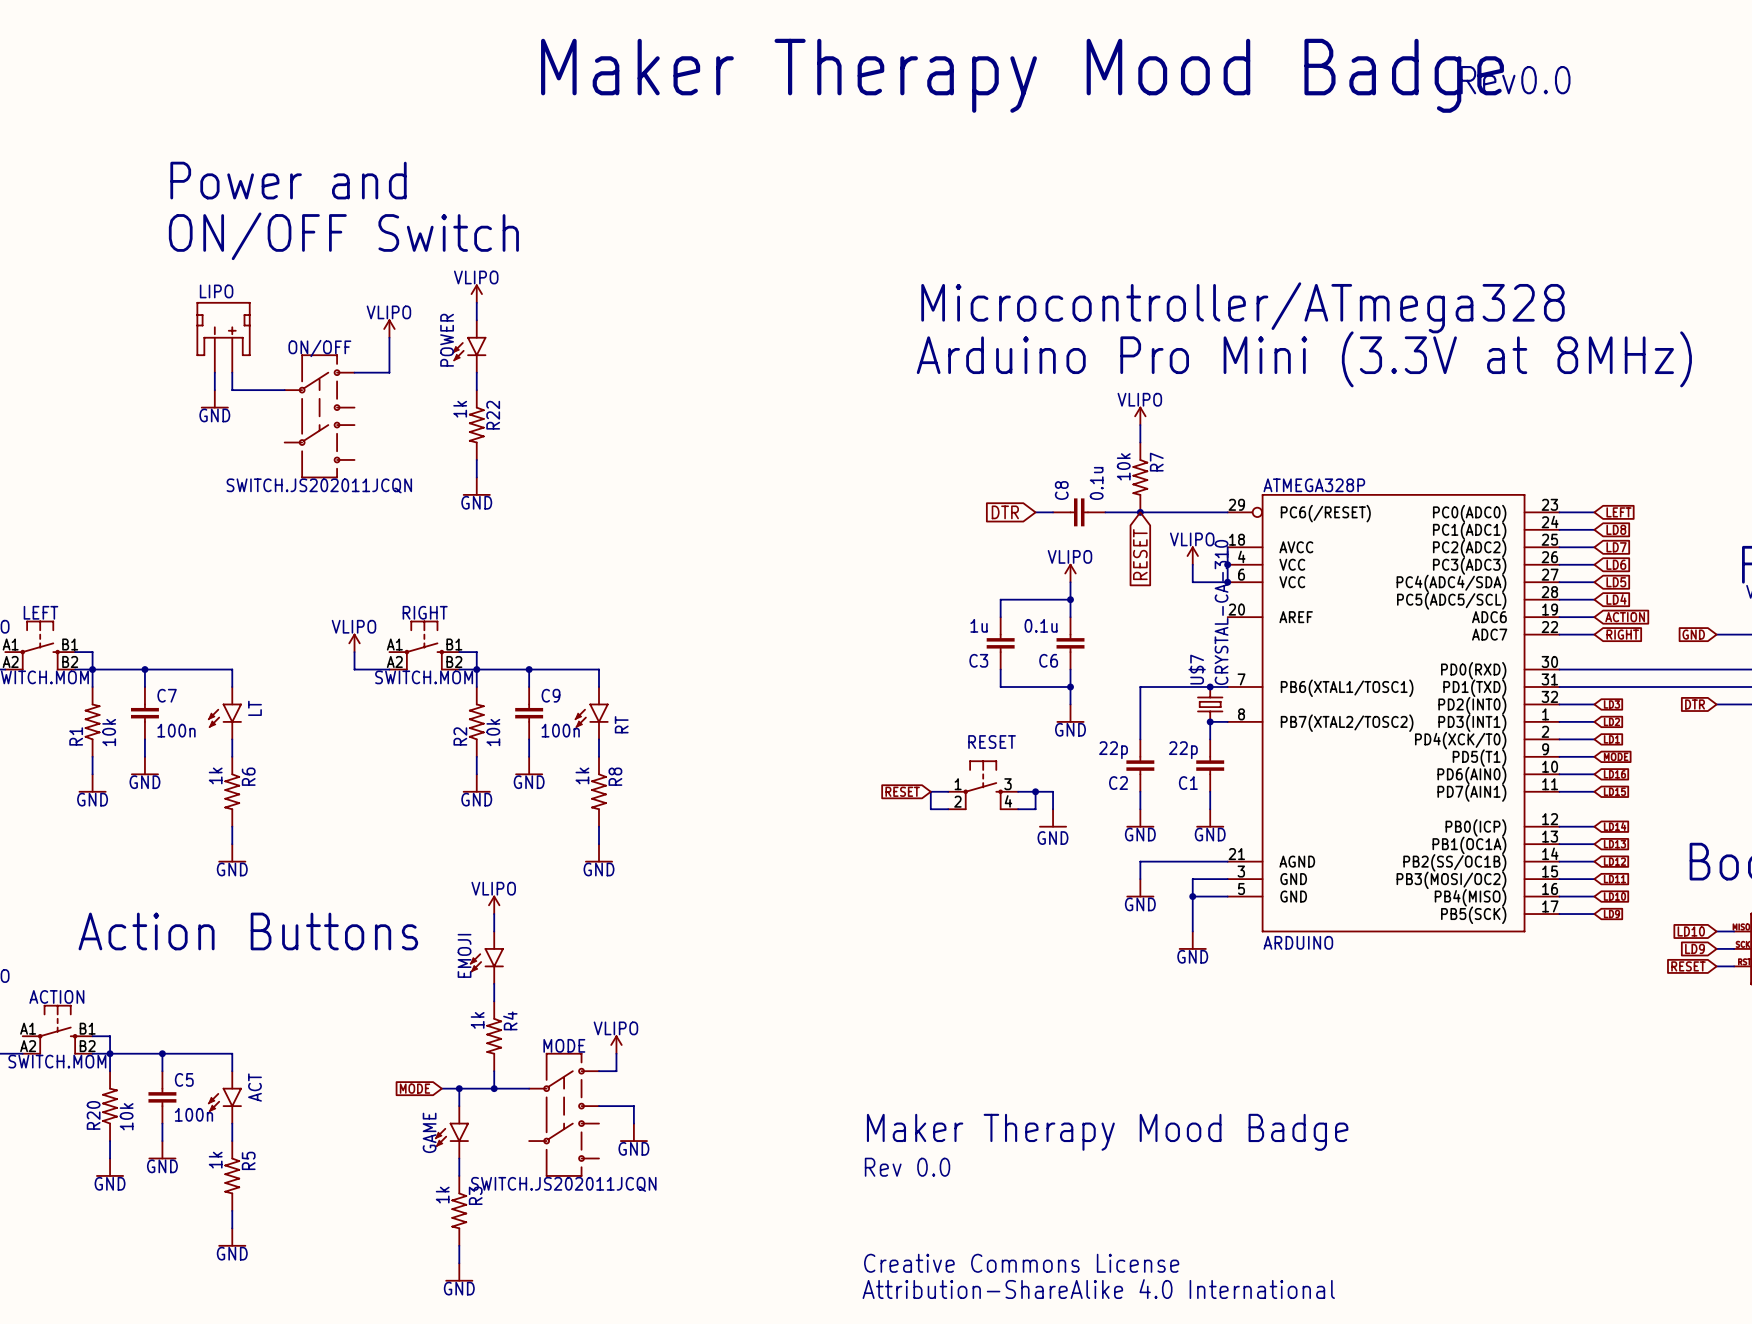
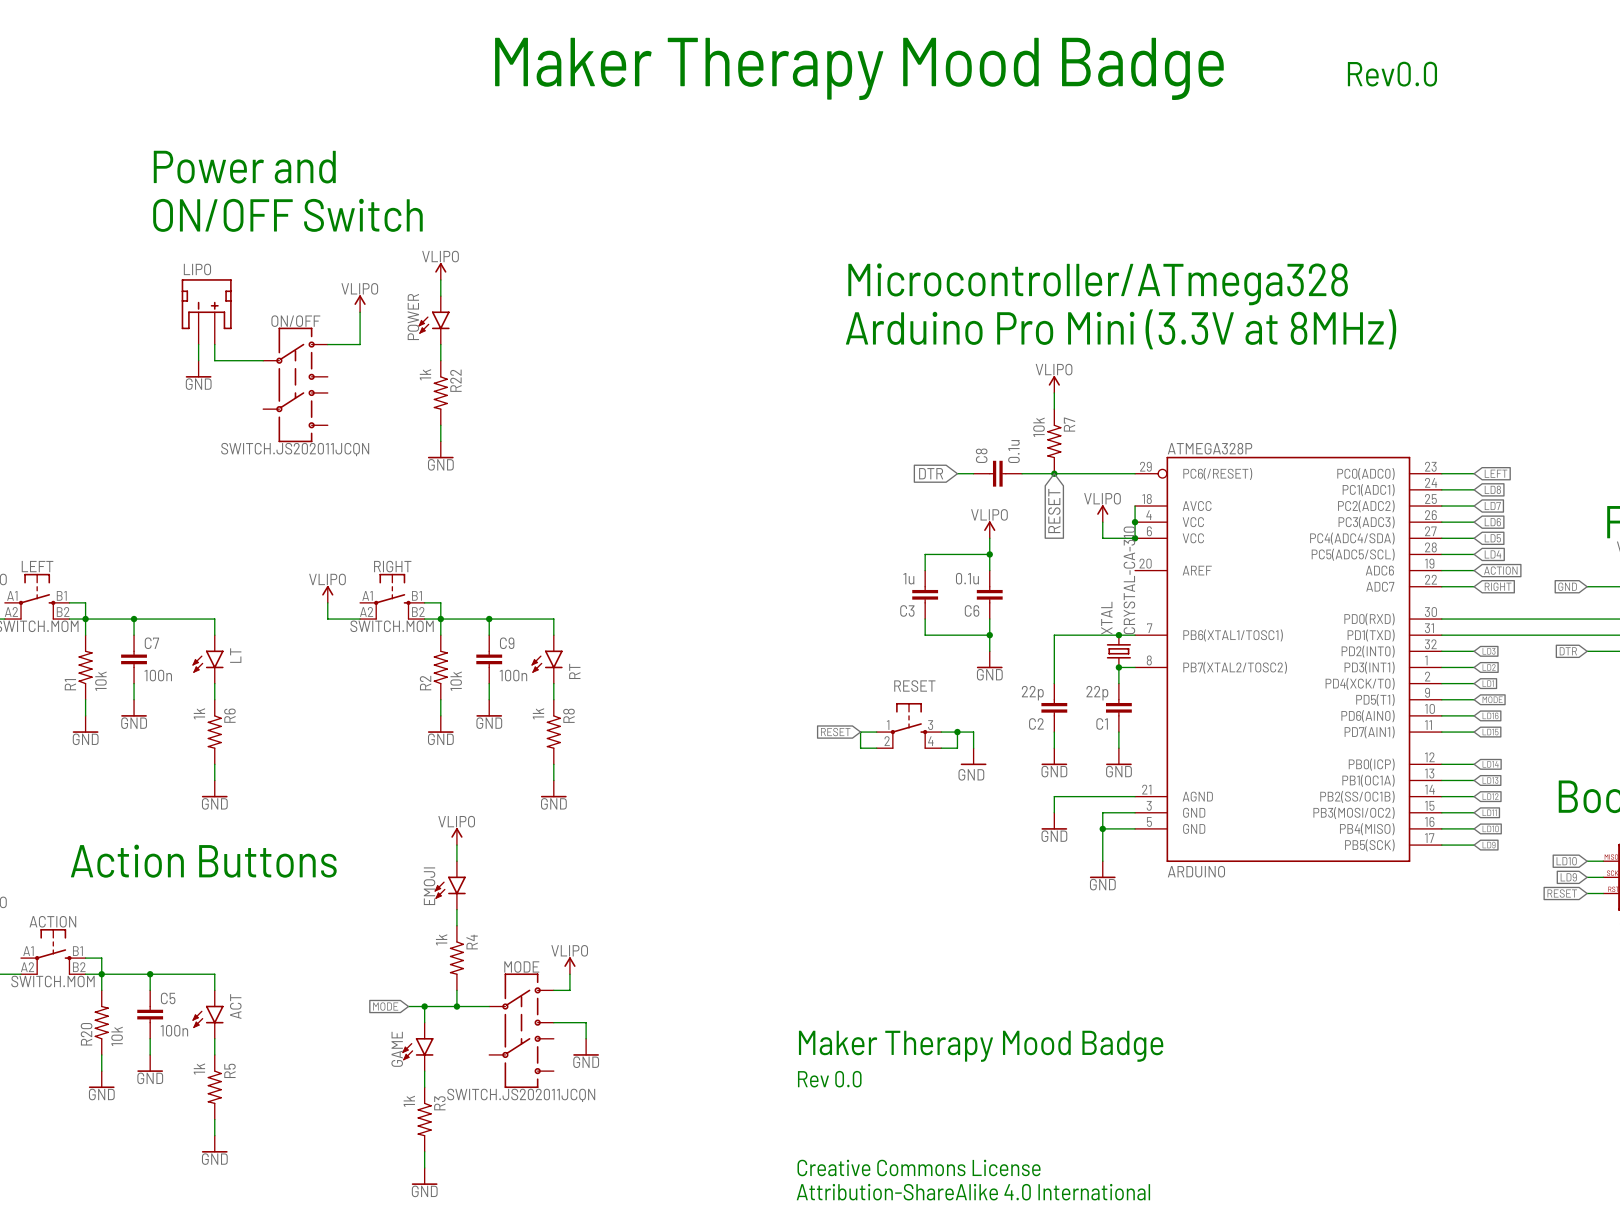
U$7 name: U$7 (1197, 669) -> XTAL (1106, 618)

